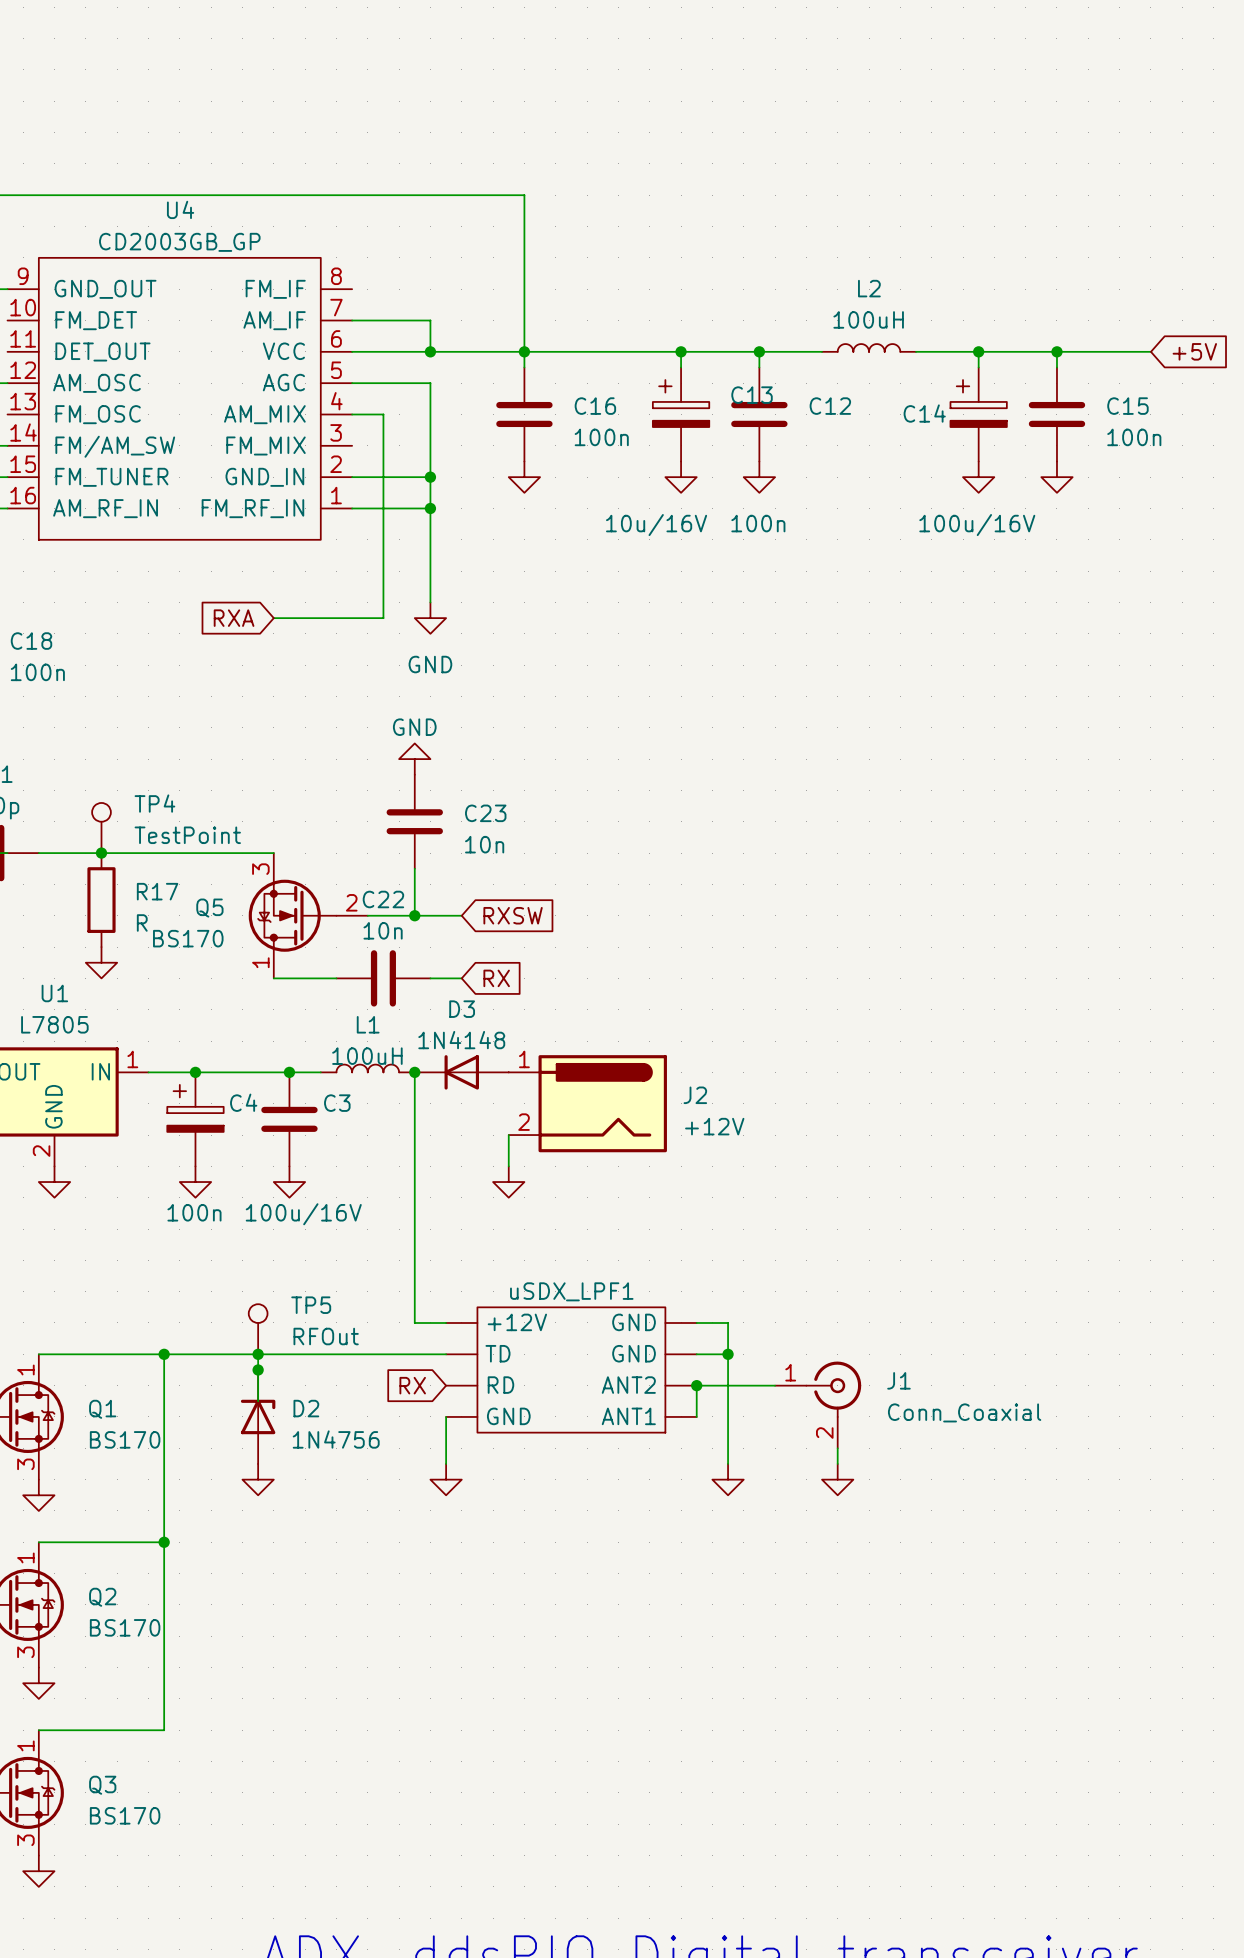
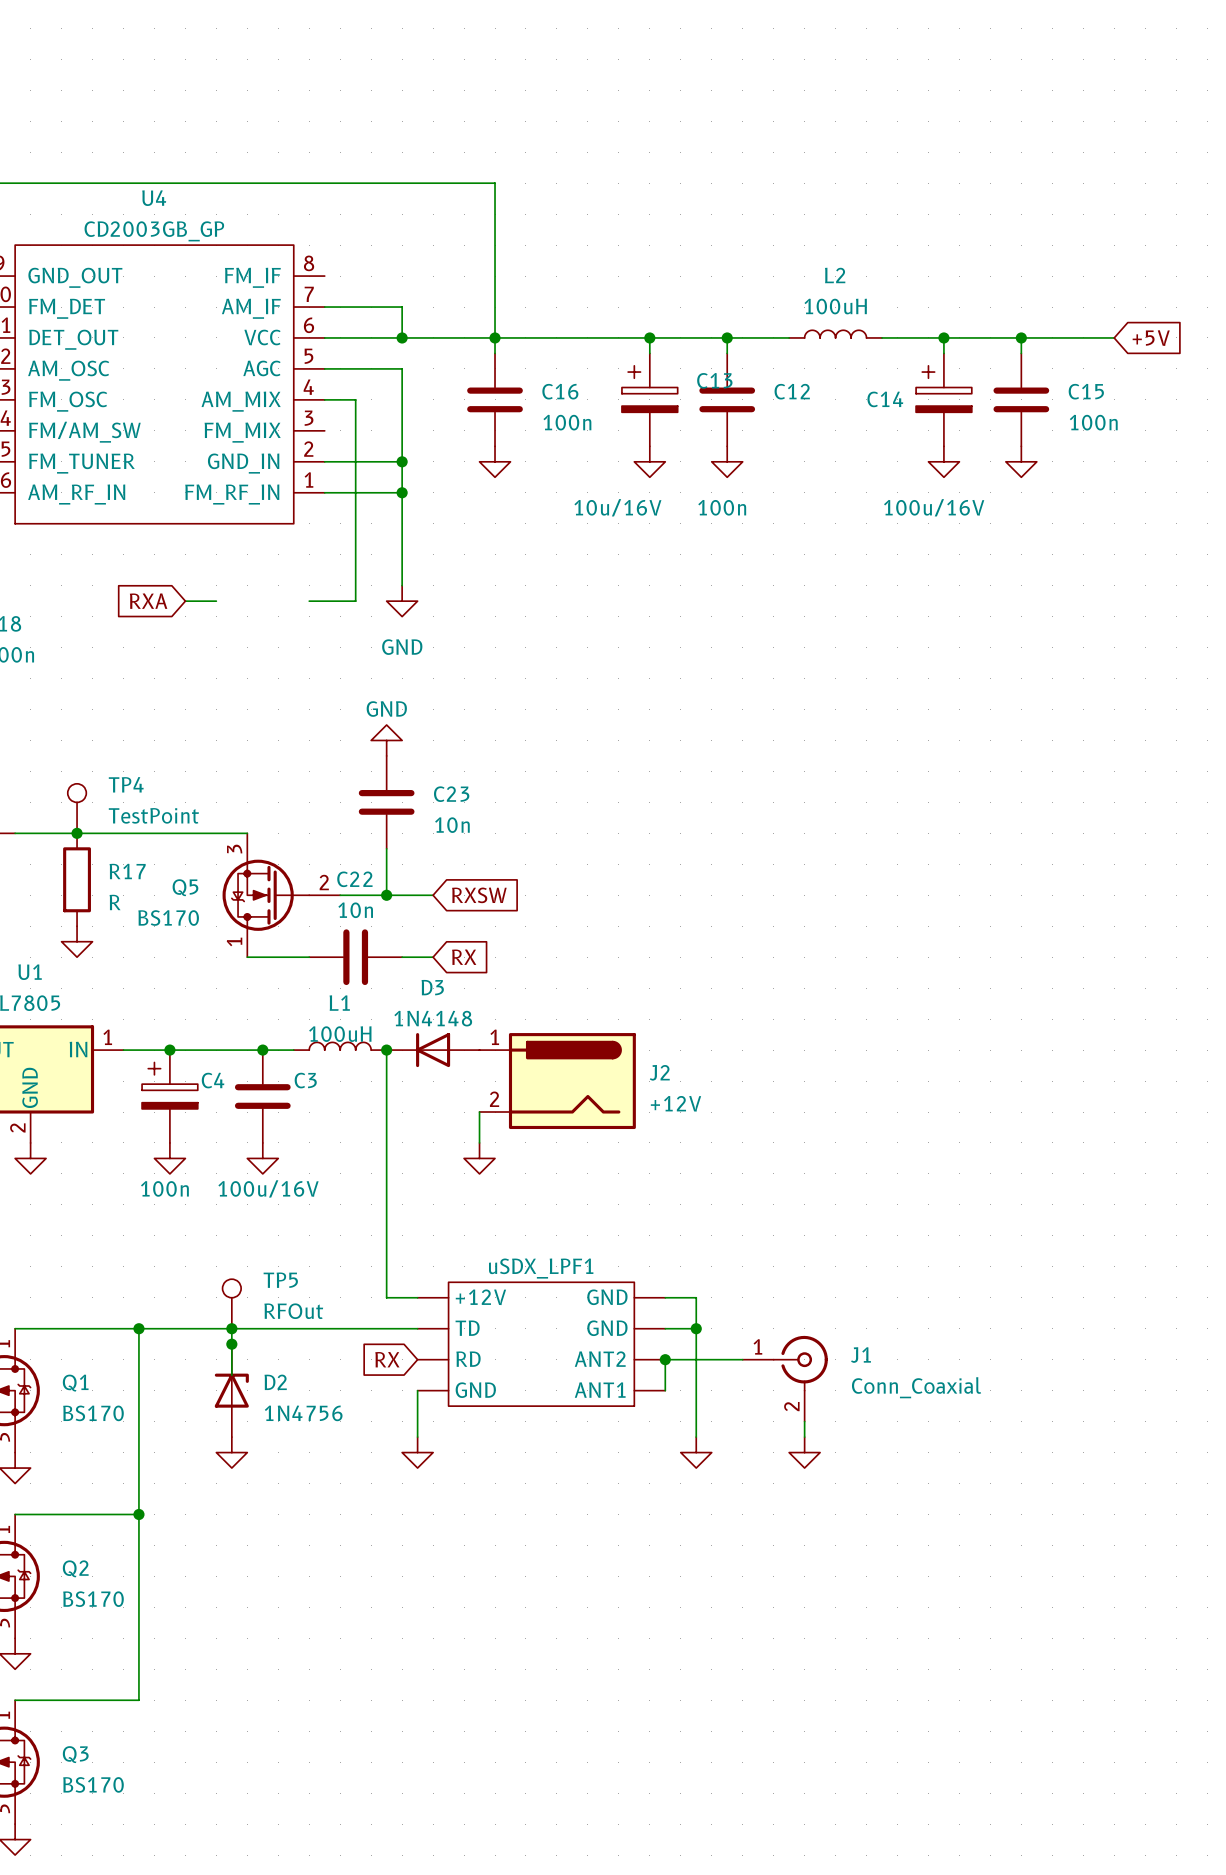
wire: none -> (185, 601) (216, 601)
global label position: RXA (234, 618) -> RXA (148, 601)
wire: (273, 618) (336, 618) -> none

